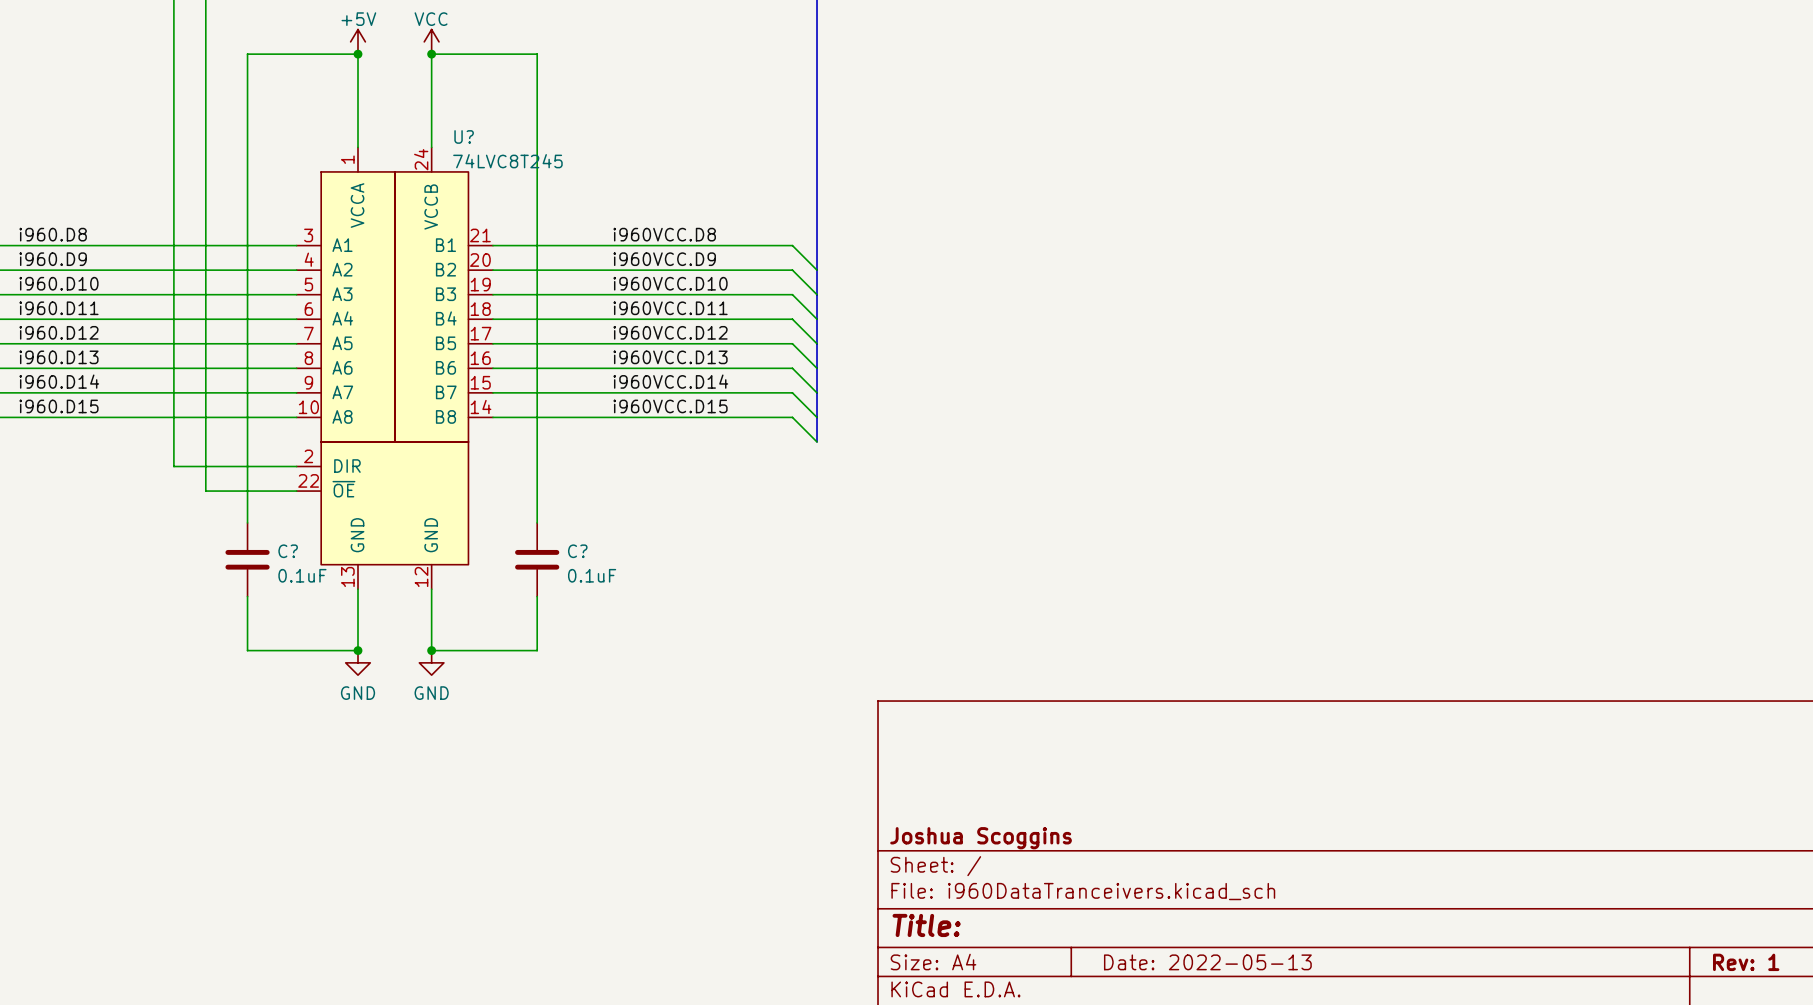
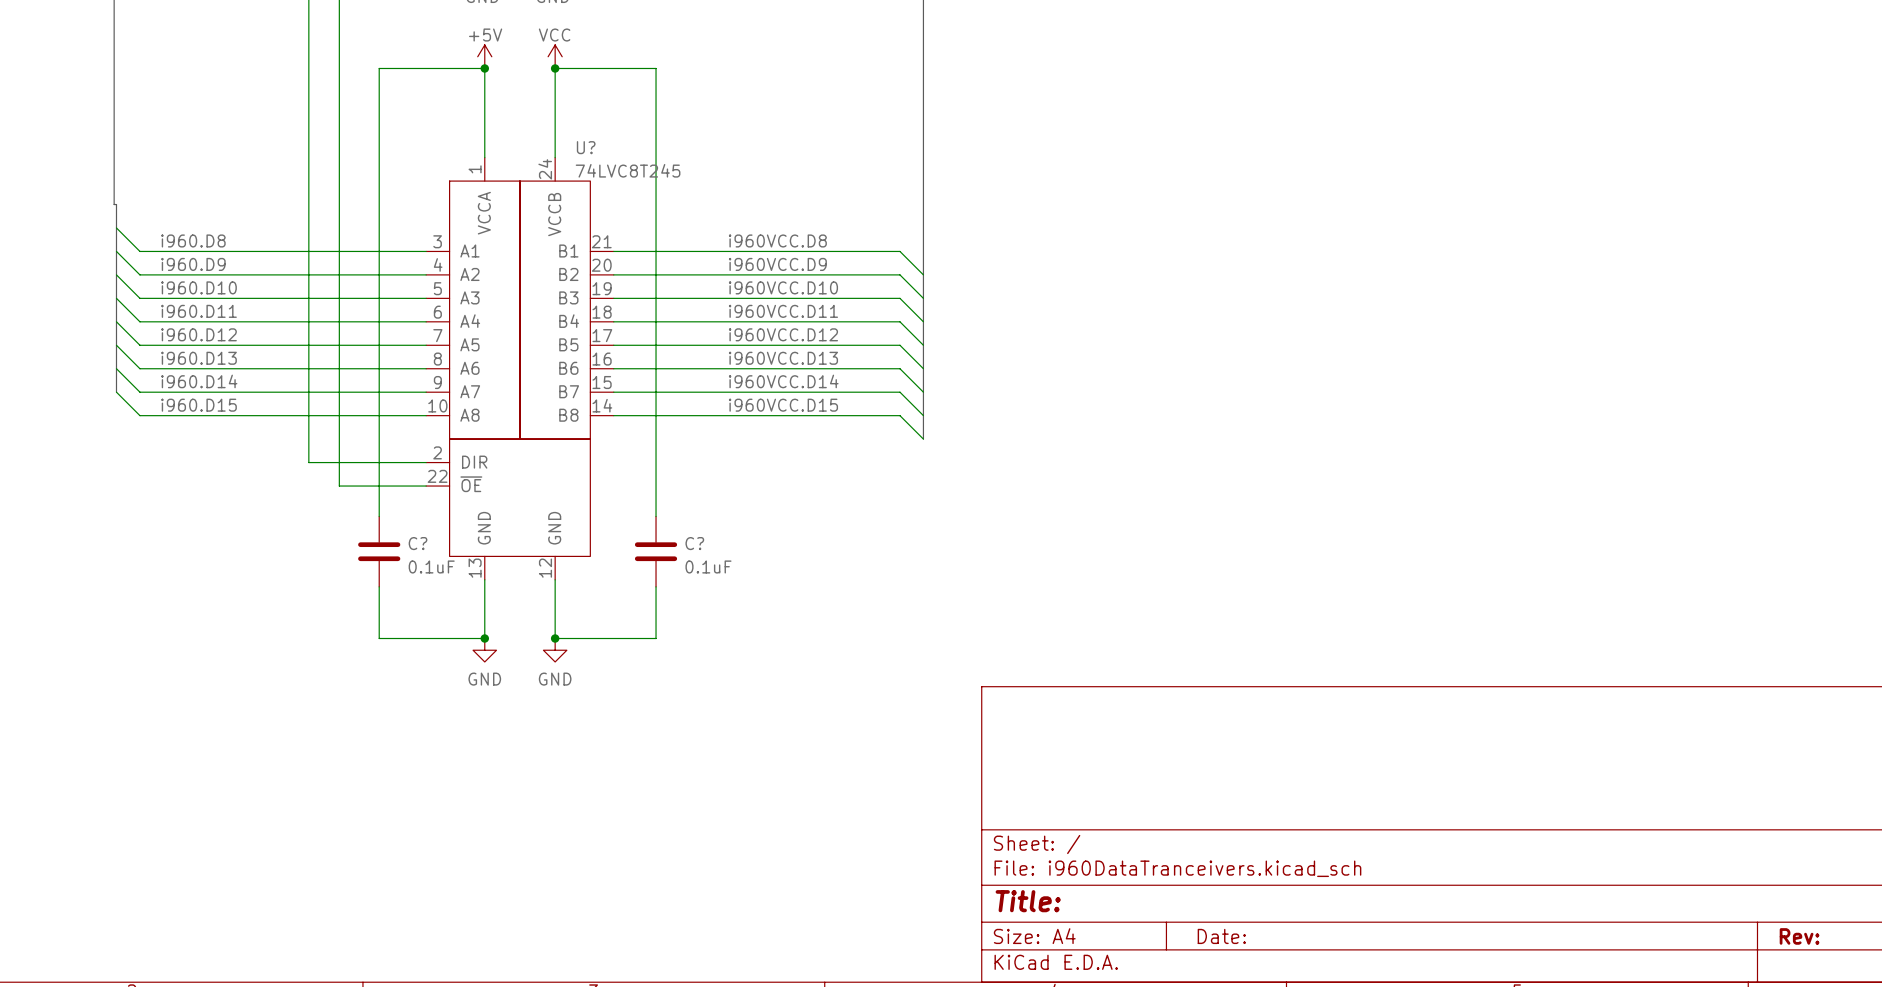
title block: Joshua Scoggins (981, 838) -> none
title block: Date: 2022-05-13 (1207, 962) -> Date: (1221, 936)
title block: Rev: 1 (1746, 962) -> Rev: (1799, 936)

